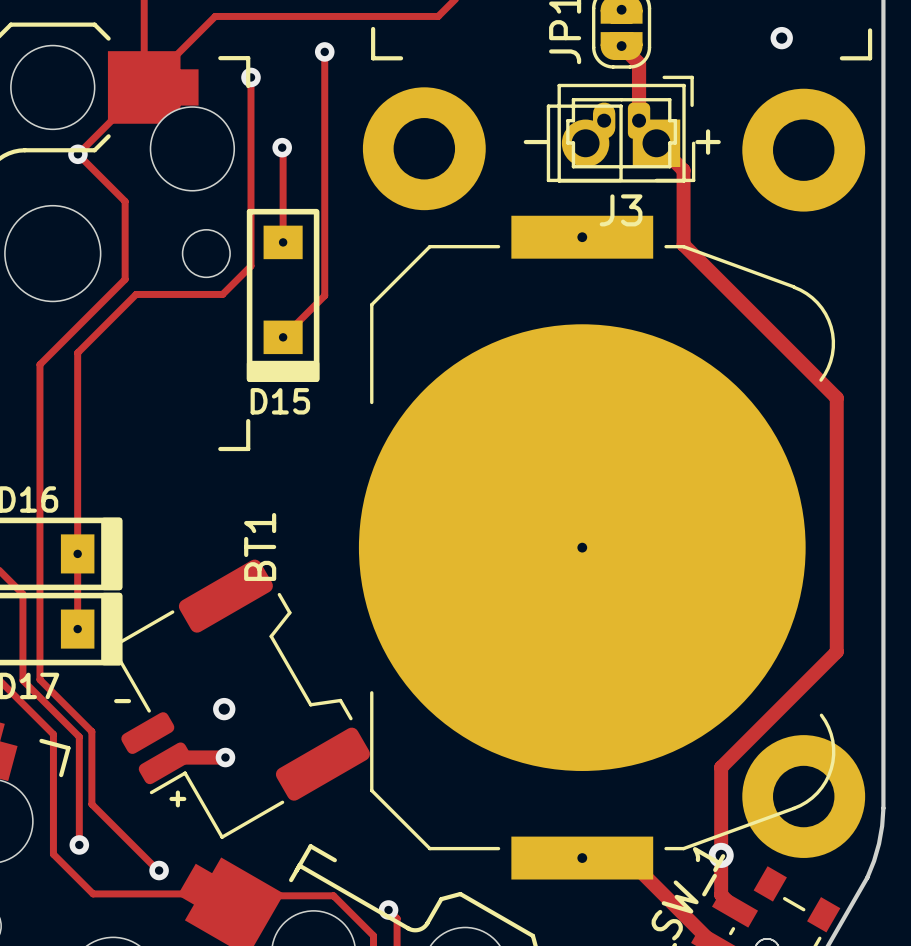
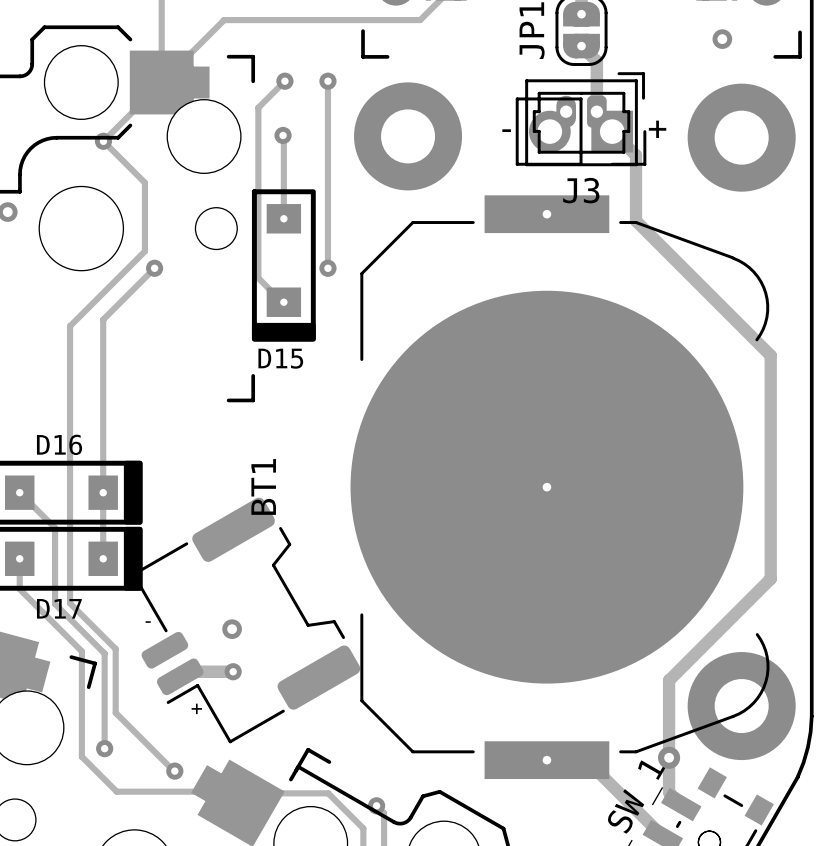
track: (324, 51) (324, 295) (283, 337) -> none
via: (324, 51) -> none
track: (250, 77) (250, 266) (222, 294) (136, 294) (77, 352) (77, 357) -> (154, 268) (103, 319)
via: (250, 77) -> none
track: none -> (284, 81) (258, 107) (258, 278) (286, 305)
via: none -> (284, 81)
track: none -> (327, 81) (327, 268)
via: none -> (327, 81)
via: none -> (154, 268)
via: none -> (327, 268)

